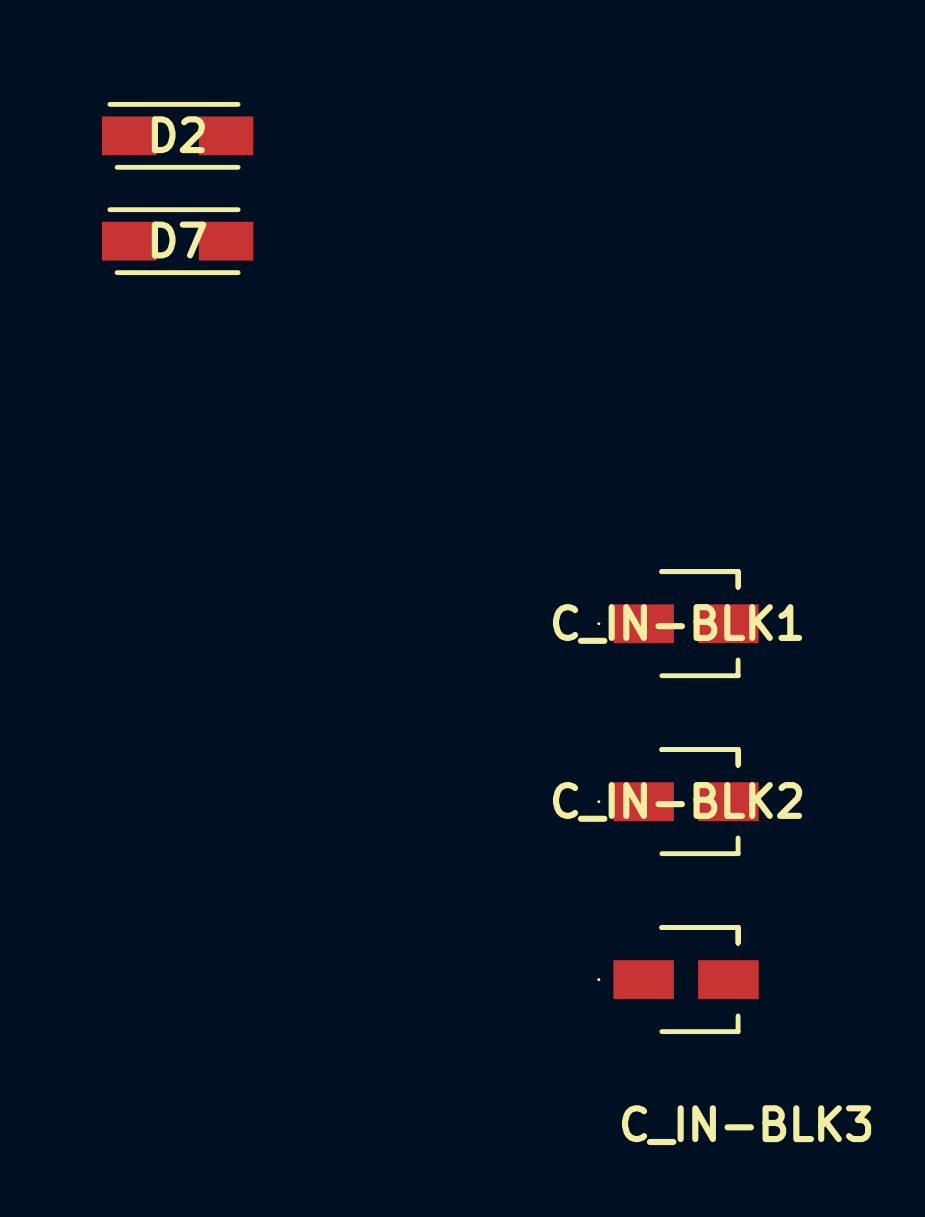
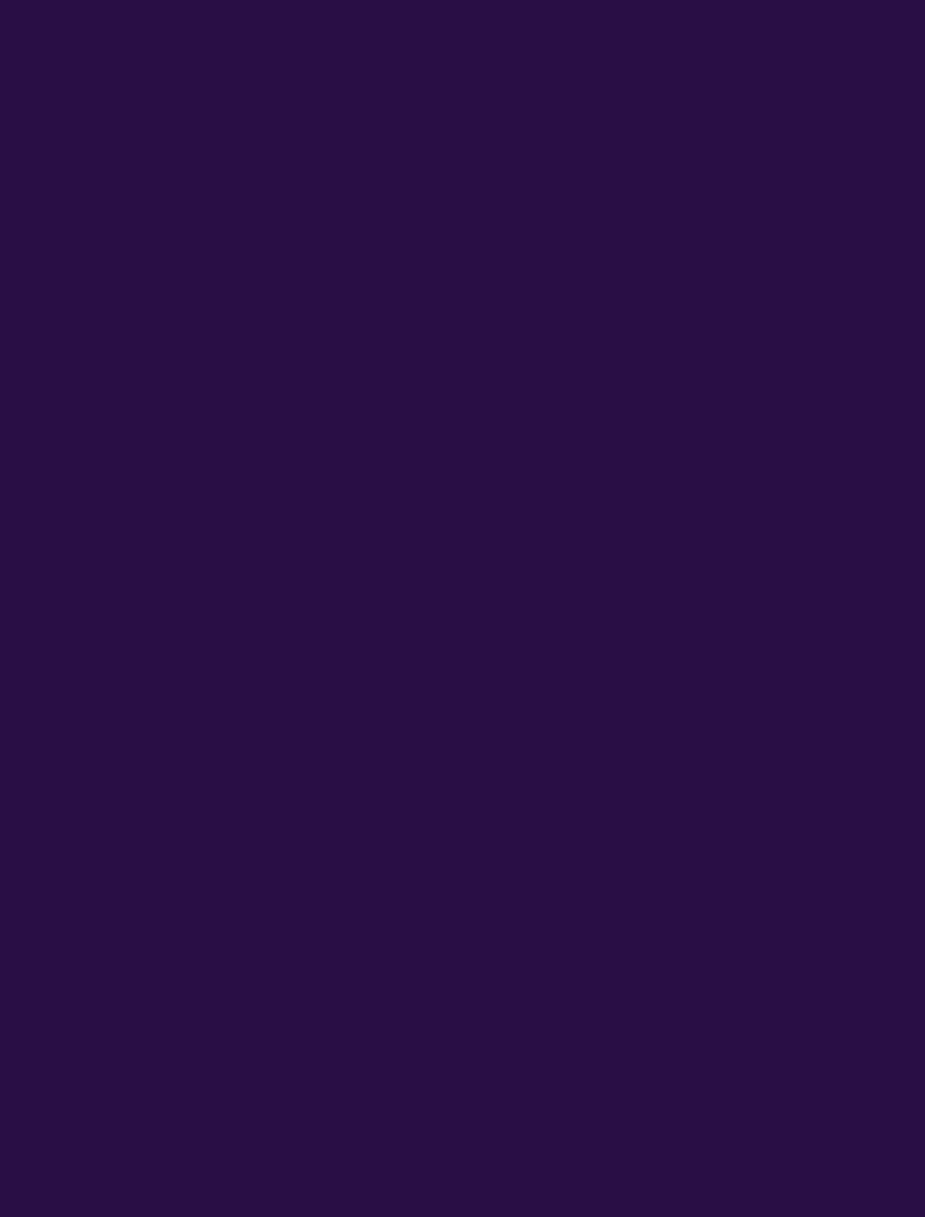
D2: (177, 135) -> none
D7: (177, 241) -> none
C_IN-BLK1: (678, 623) -> none
C_IN-BLK2: (678, 801) -> none
C_IN-BLK3: (678, 979) -> none

